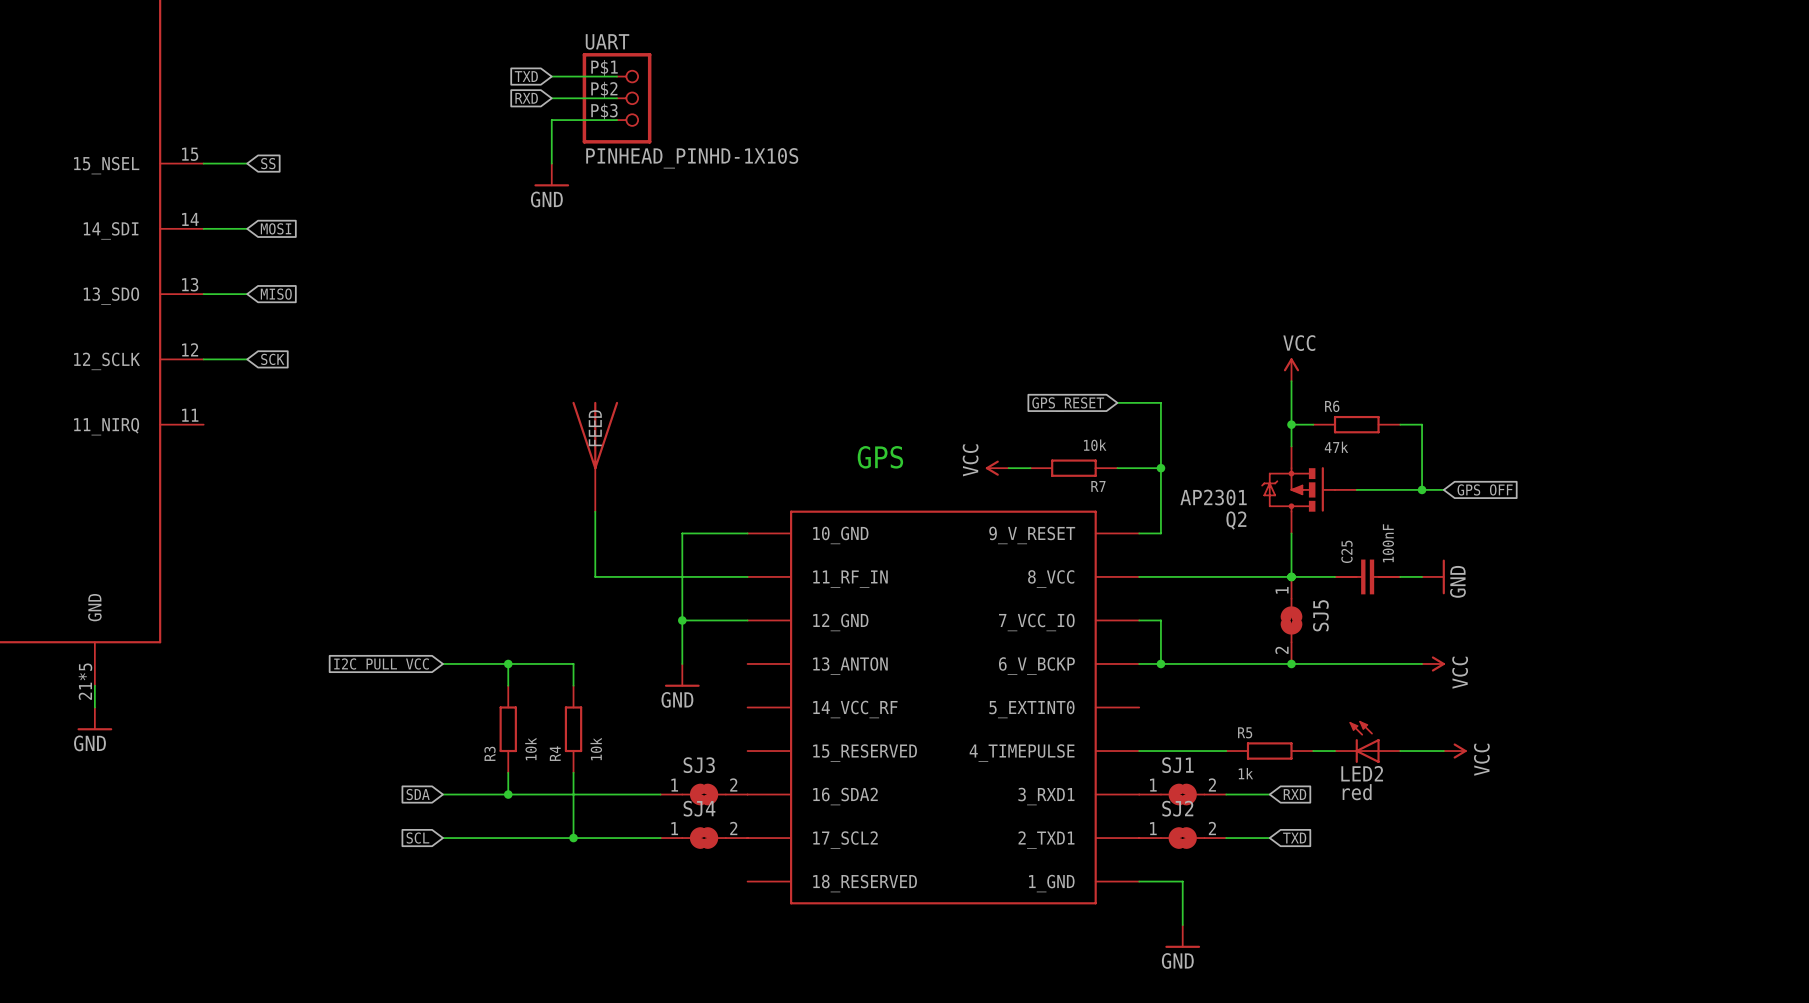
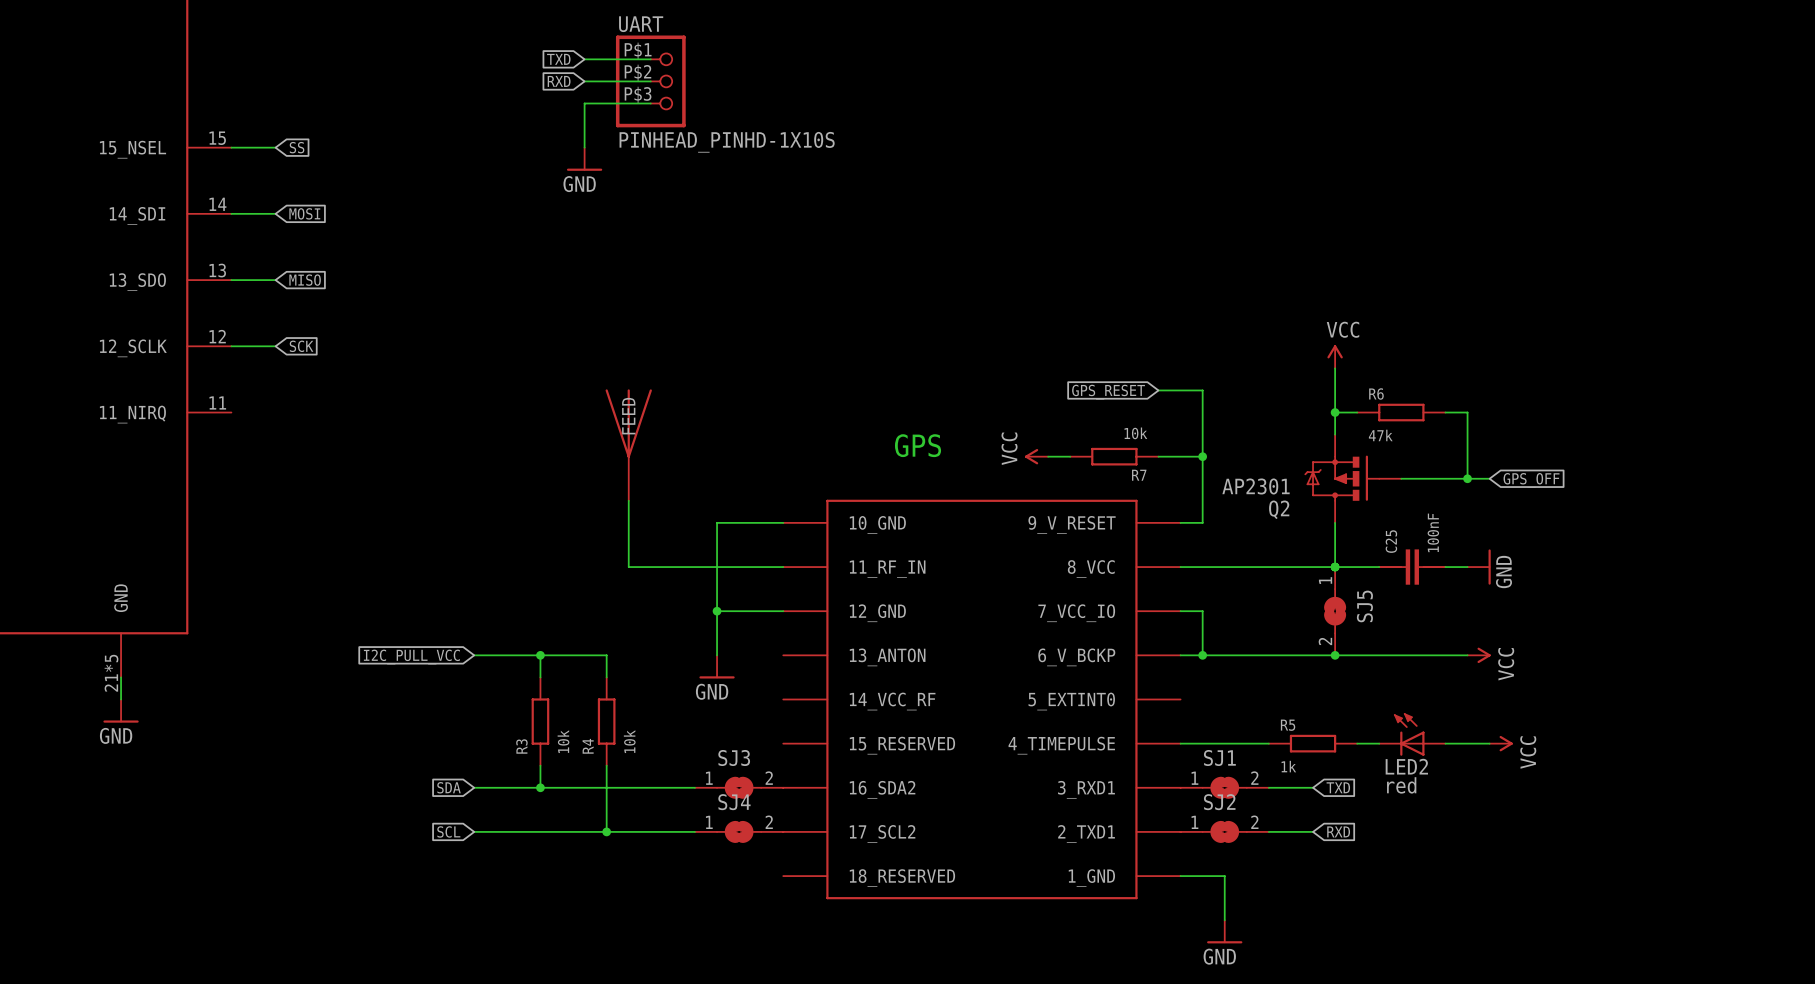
global label: RXD (1294, 794) -> TXD (1338, 787)
global label: TXD (1294, 838) -> RXD (1338, 831)

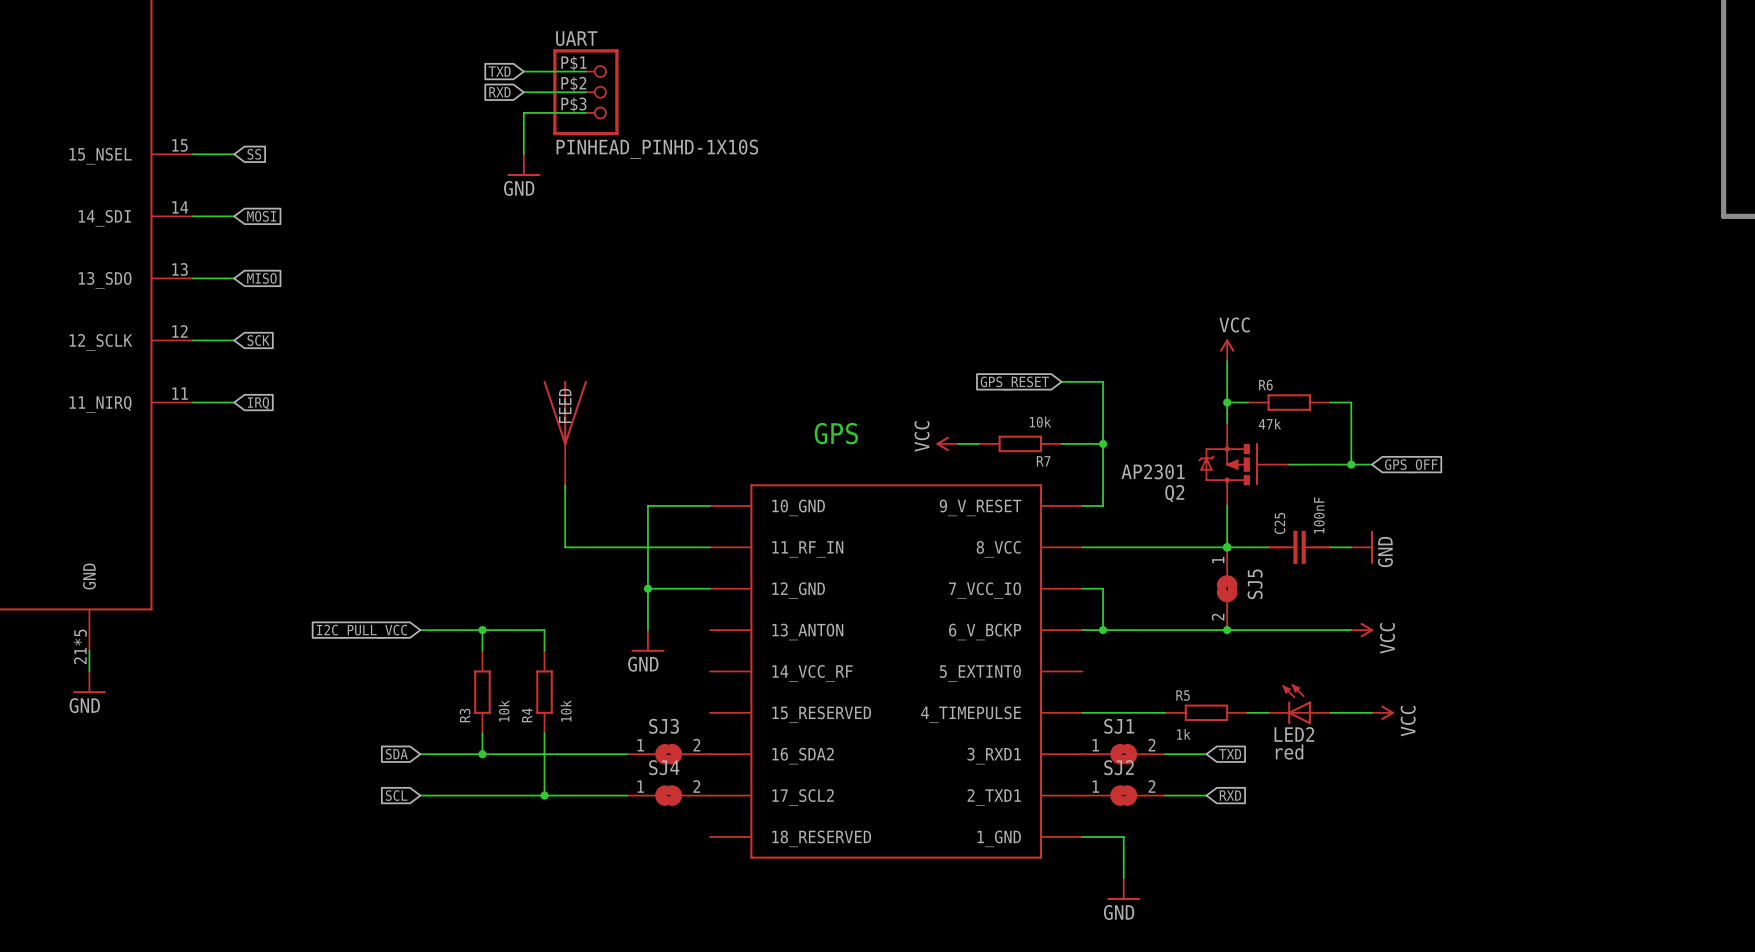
wire: none -> (192, 402) (234, 402)
global label: none -> IRQ (258, 403)

